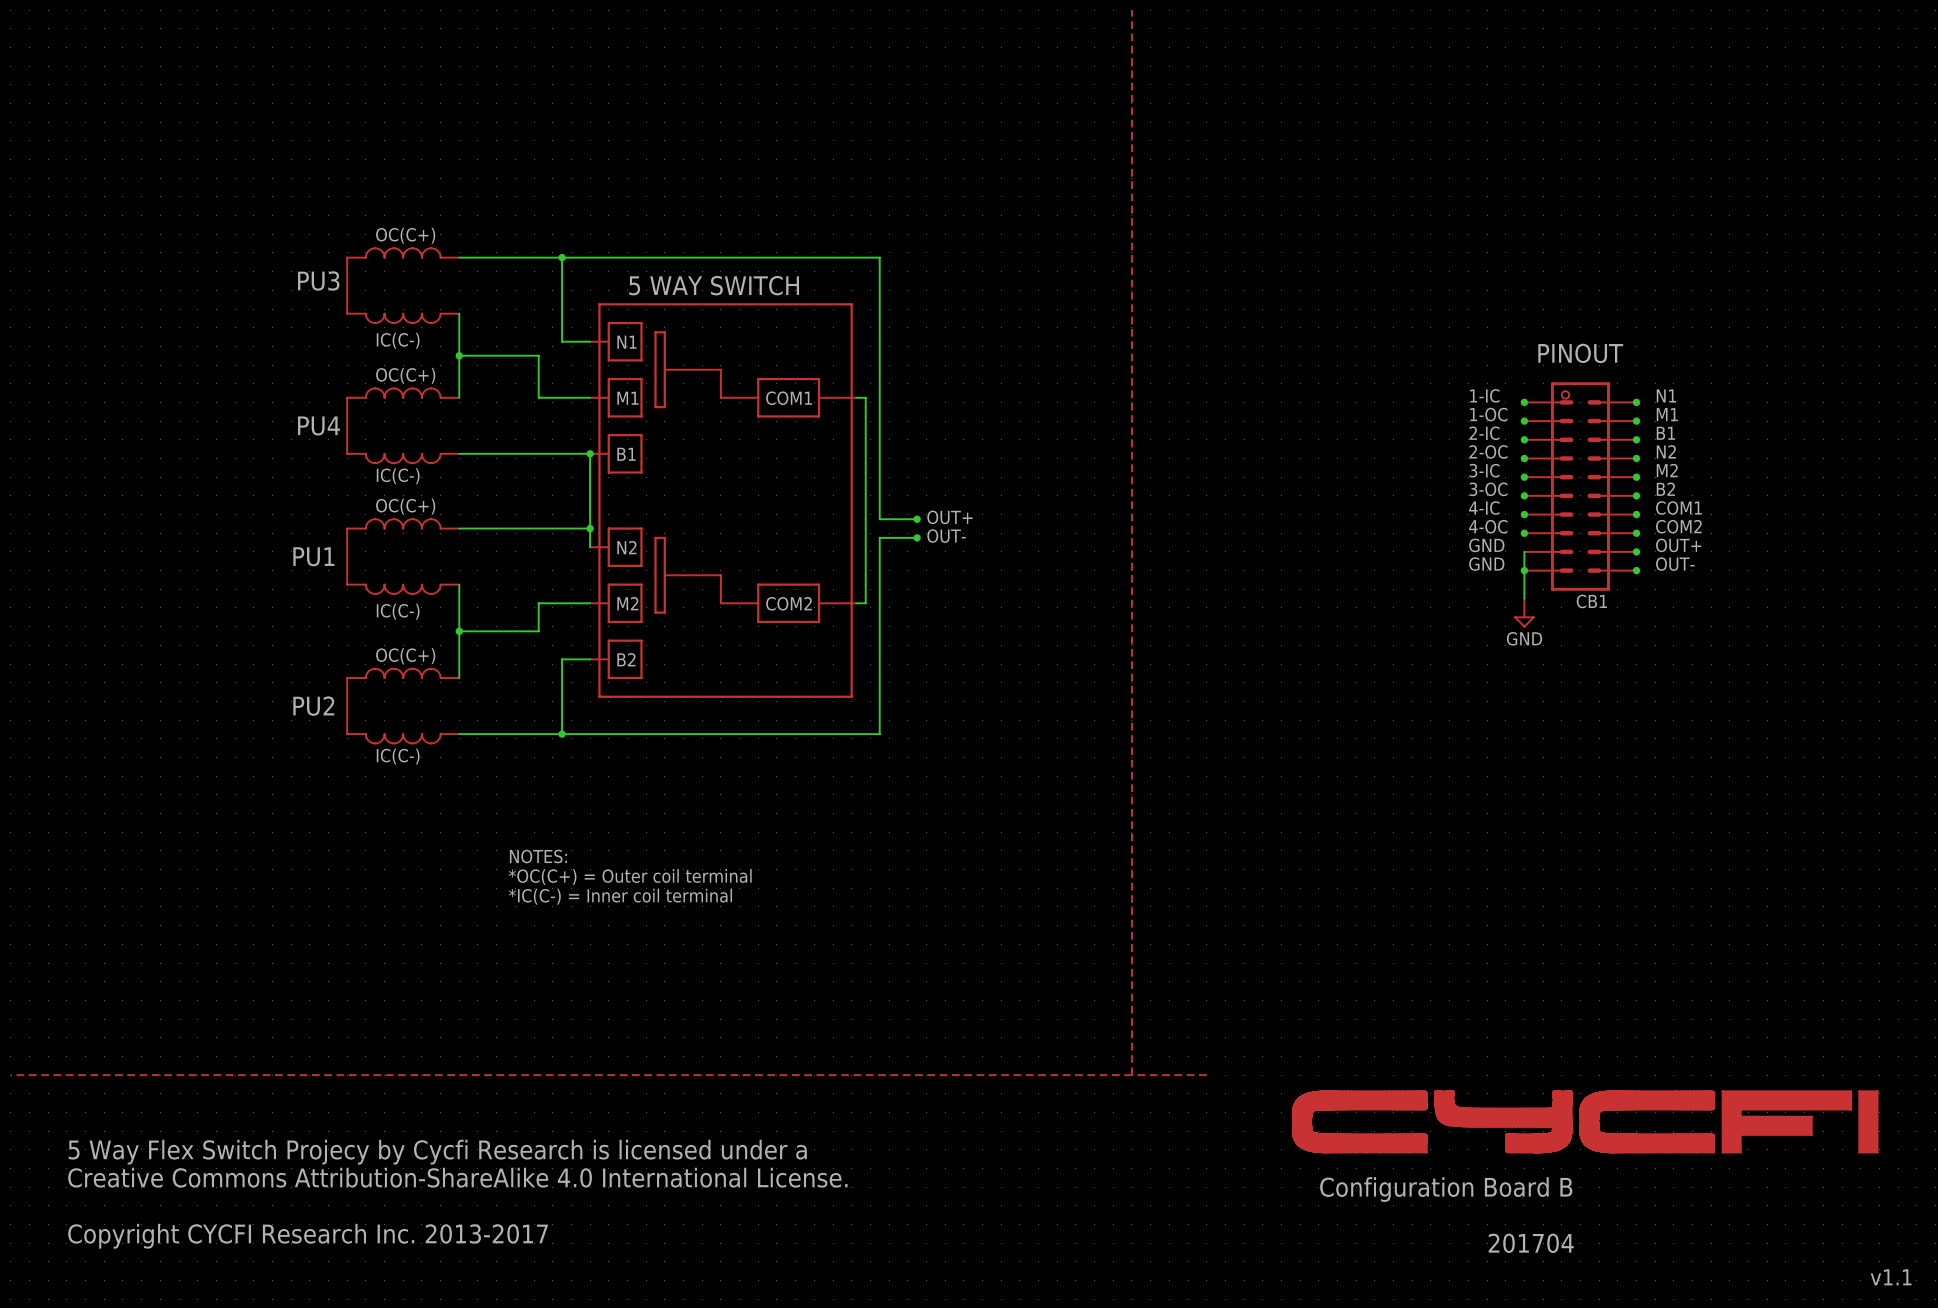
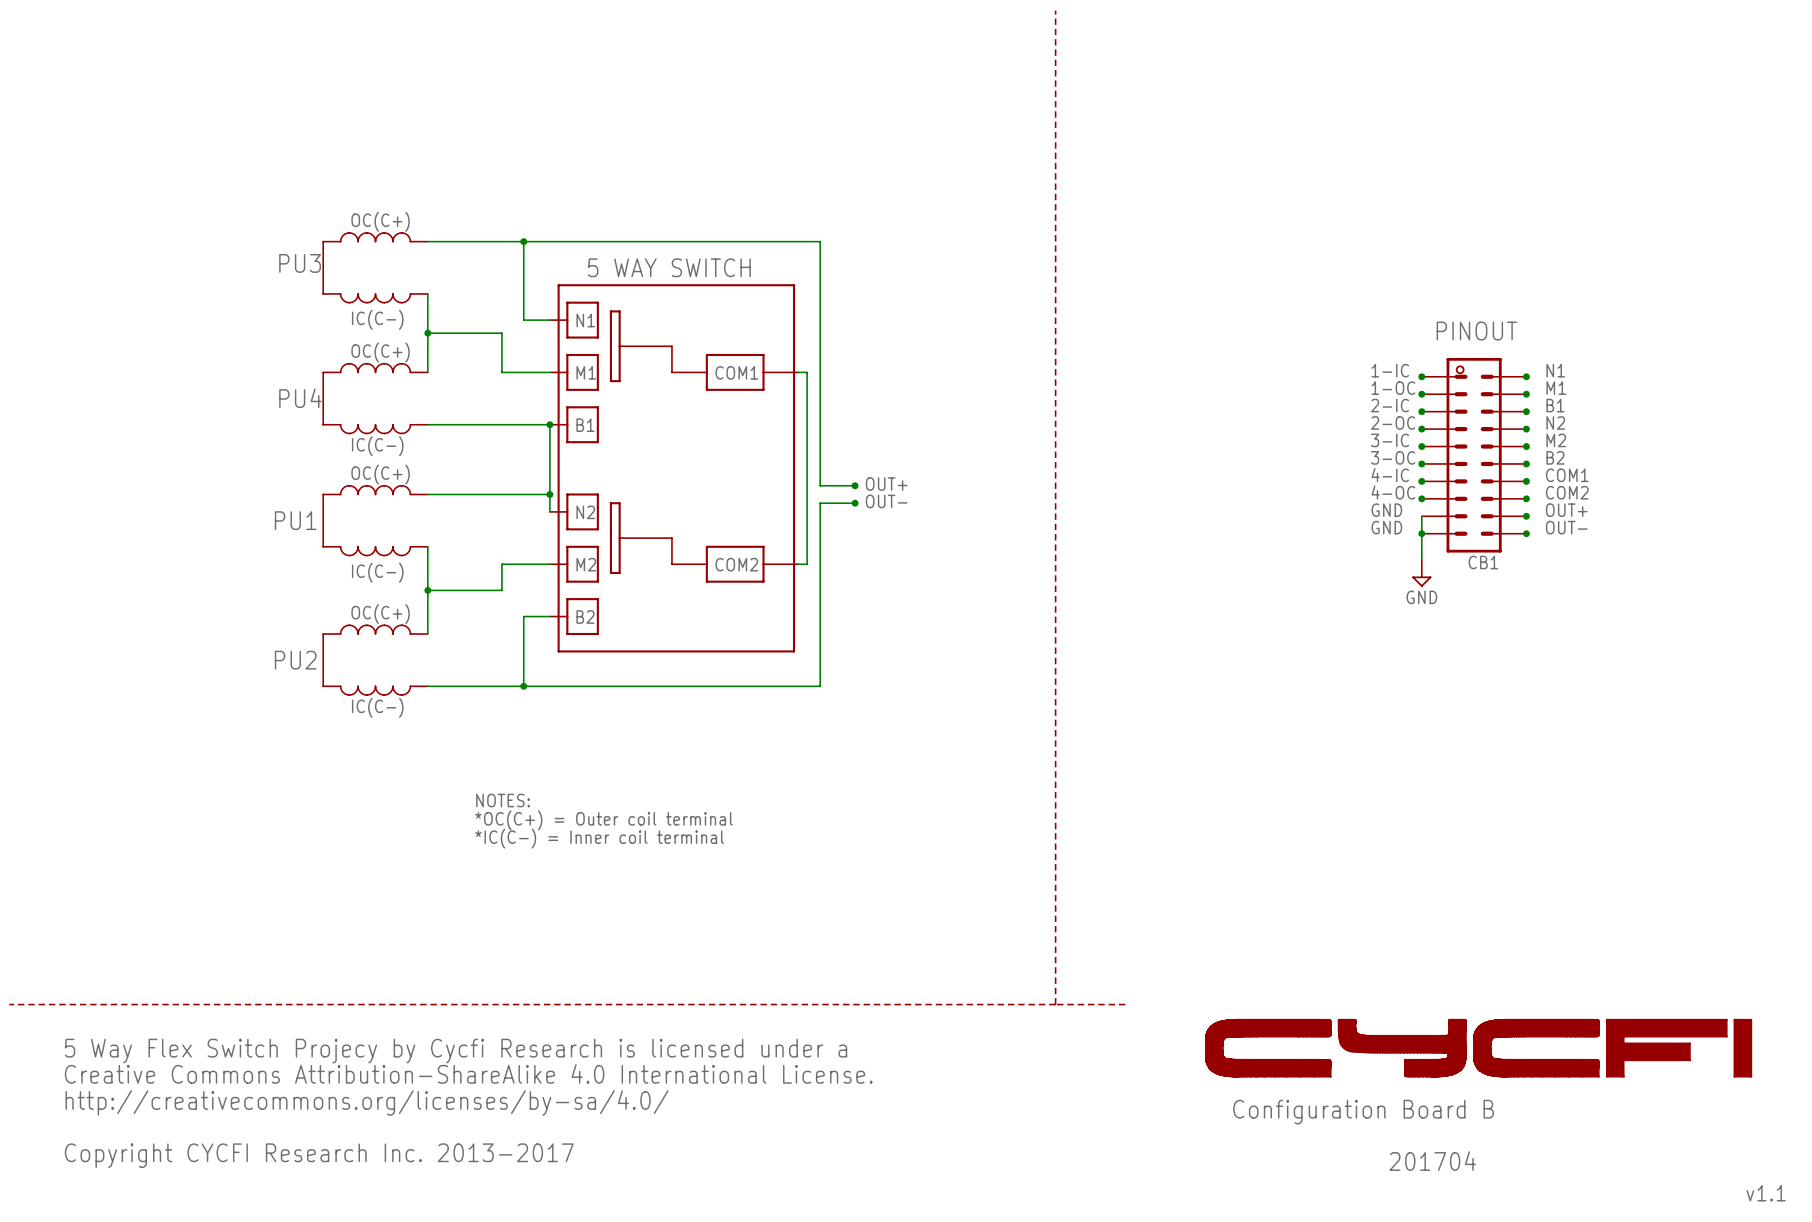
text: none -> 5 Way Flex Switch Projecy by Cycfi Research is licensed under a (456, 1051)
text: 5 Way Flex Switch Projecy by Cycfi Research is licensed under a (437, 1152) -> Creative Commons Attribution-ShareAlike 4.0 International License. (468, 1073)
text: Creative Commons Attribution-ShareAlike 4.0 International License. (457, 1177) -> http://creativecommons.org/licenses/by-sa/4.0/ (367, 1102)

